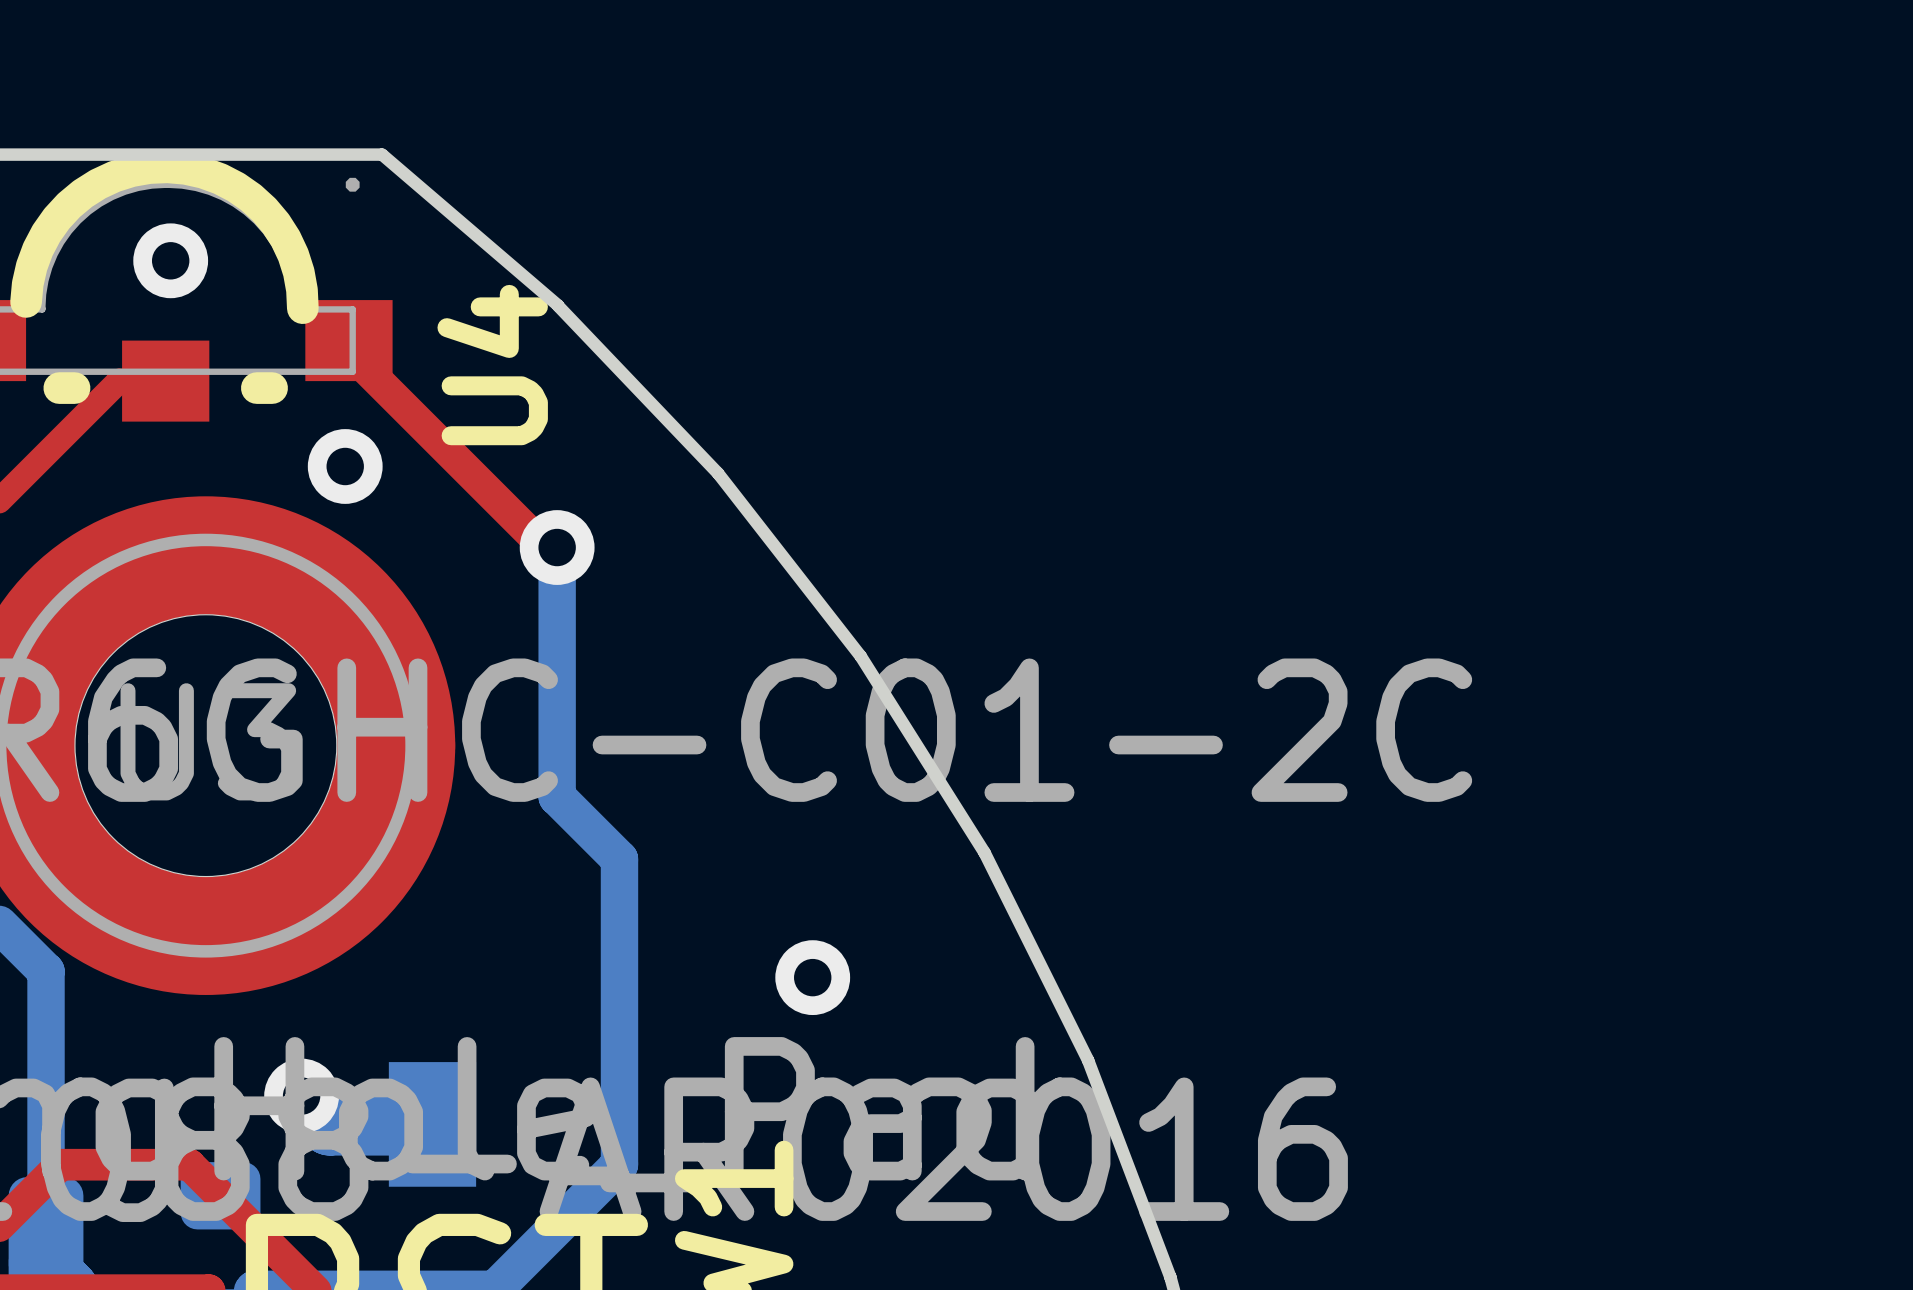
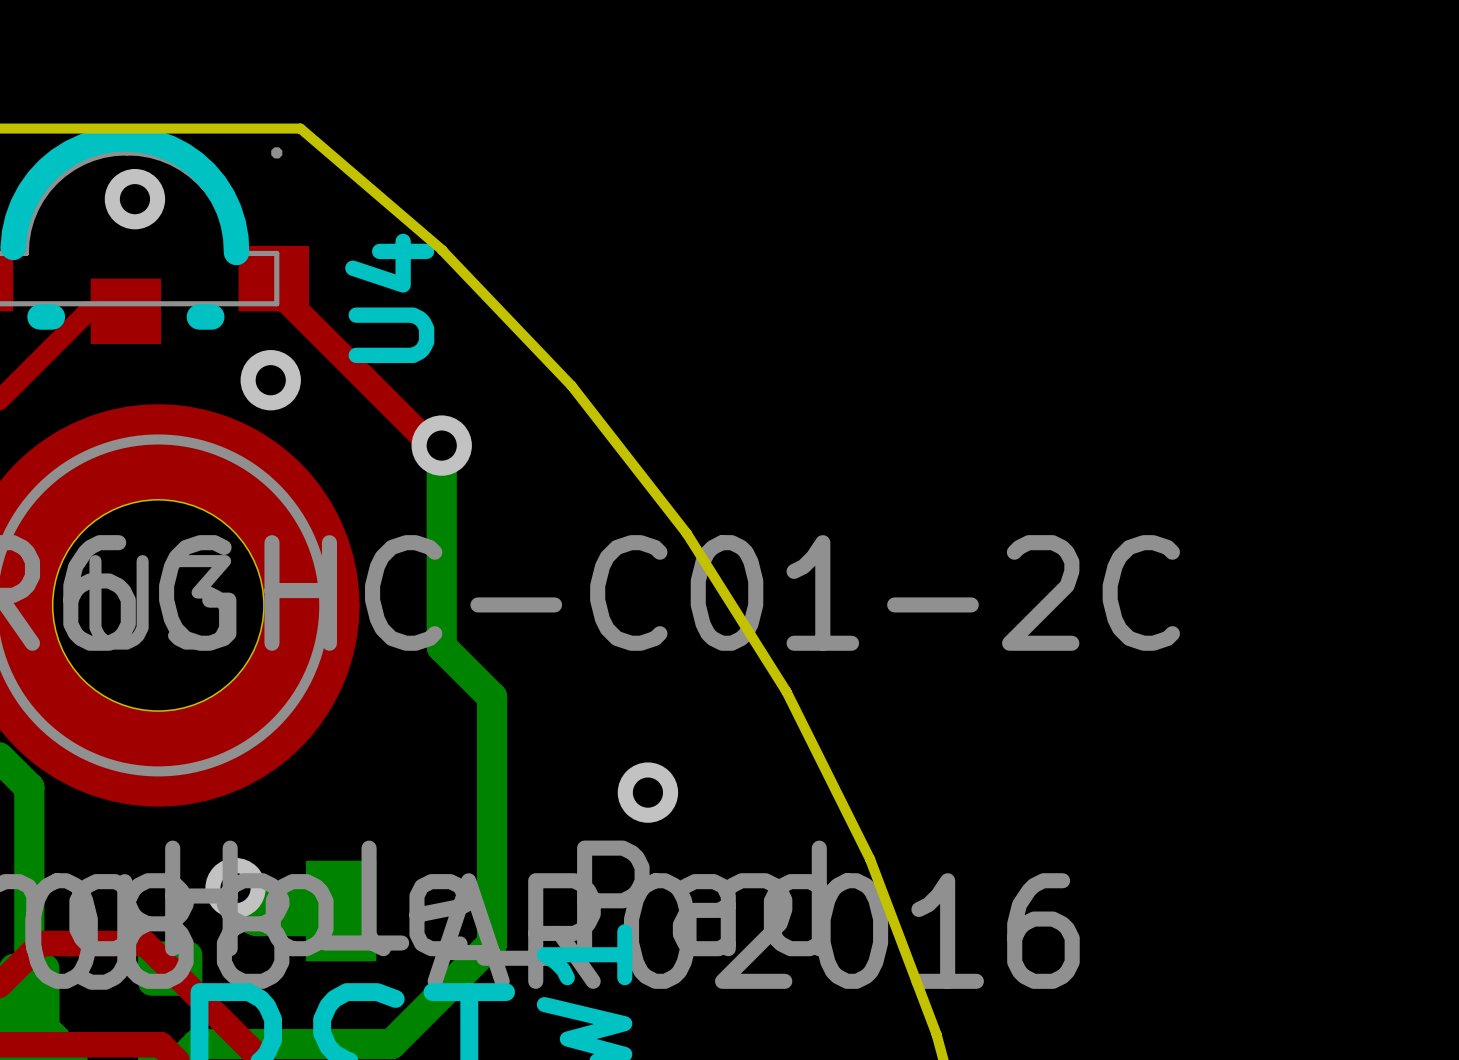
via position: (170, 260) -> (134, 199)

